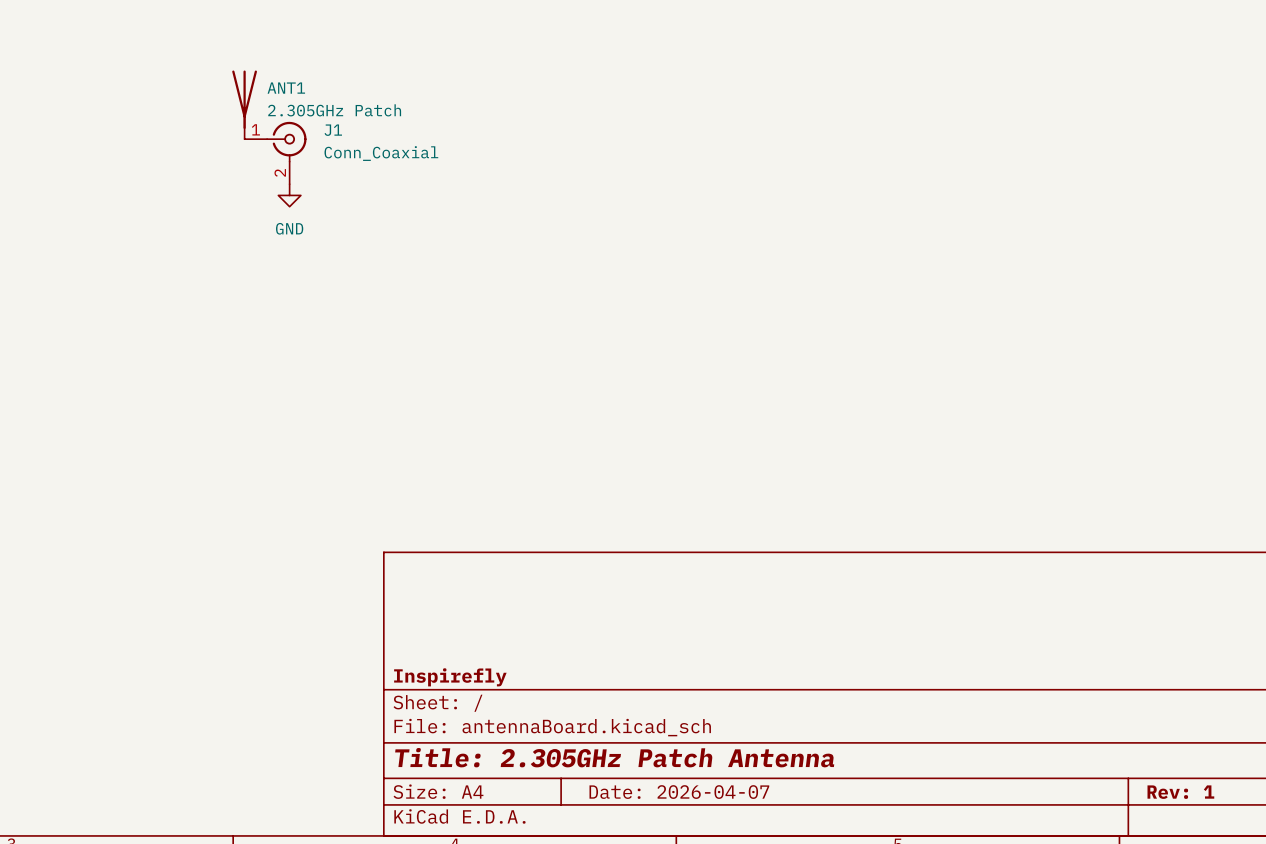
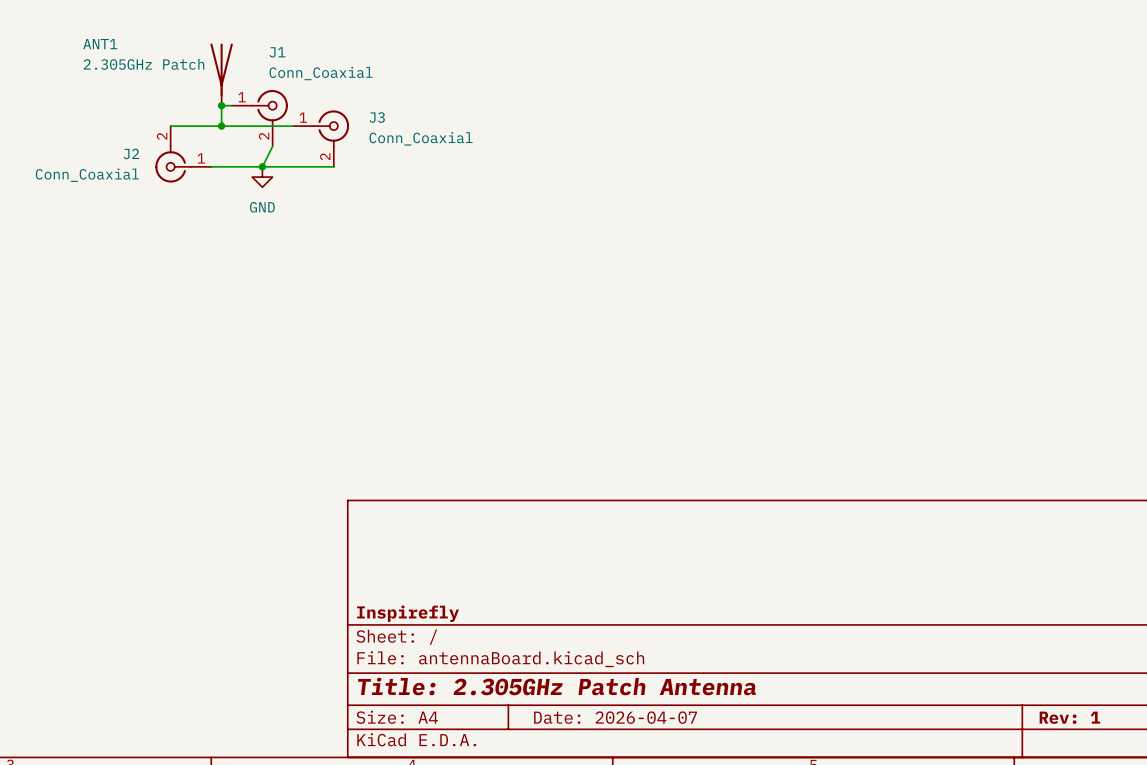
ANT1 name position: ANT1 (286, 88) -> ANT1 (100, 44)
ANT1 position: (244, 104) -> (221, 74)
ANT1 value position: 2.305GHz Patch (334, 110) -> 2.305GHz Patch (144, 64)
junction: none -> (221, 105)
J1 name position: J1 (333, 130) -> J1 (277, 52)
wire: none -> (170, 126) (293, 126)
junction: none -> (221, 126)
J1 position: (275, 153) -> (259, 118)
J3: none -> Conn_Coaxial (321, 138)
J1 value position: Conn_Coaxial (381, 153) -> Conn_Coaxial (321, 73)
wire: none -> (272, 146) (262, 166)
J2: none -> Conn_Coaxial (183, 154)
wire: none -> (211, 166) (333, 166)
junction: none -> (262, 166)

